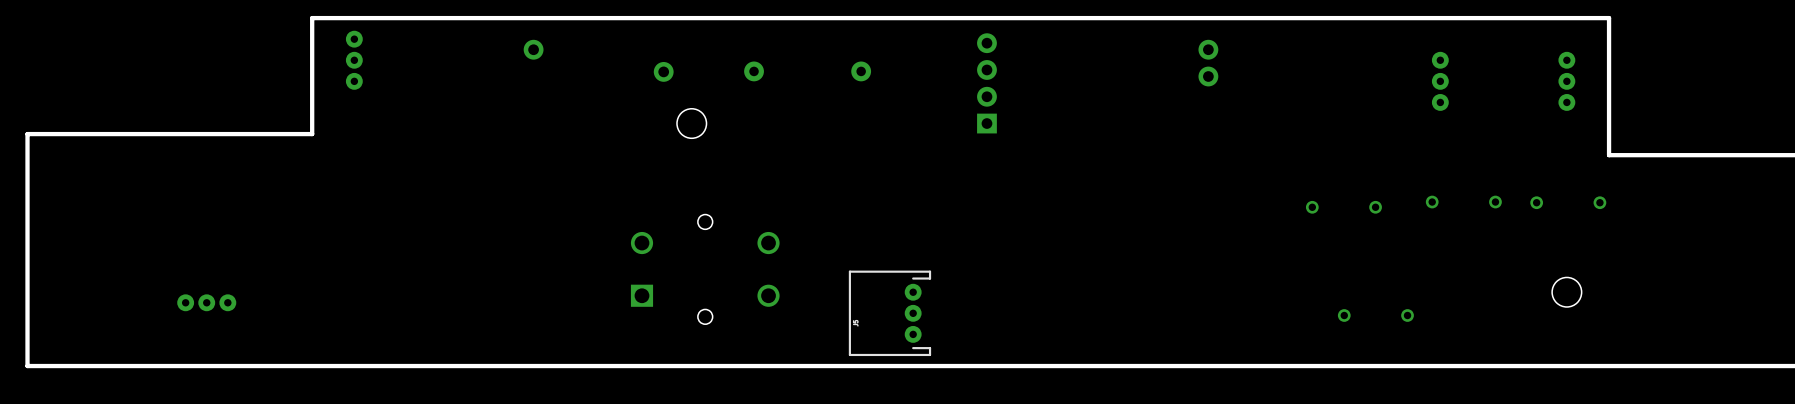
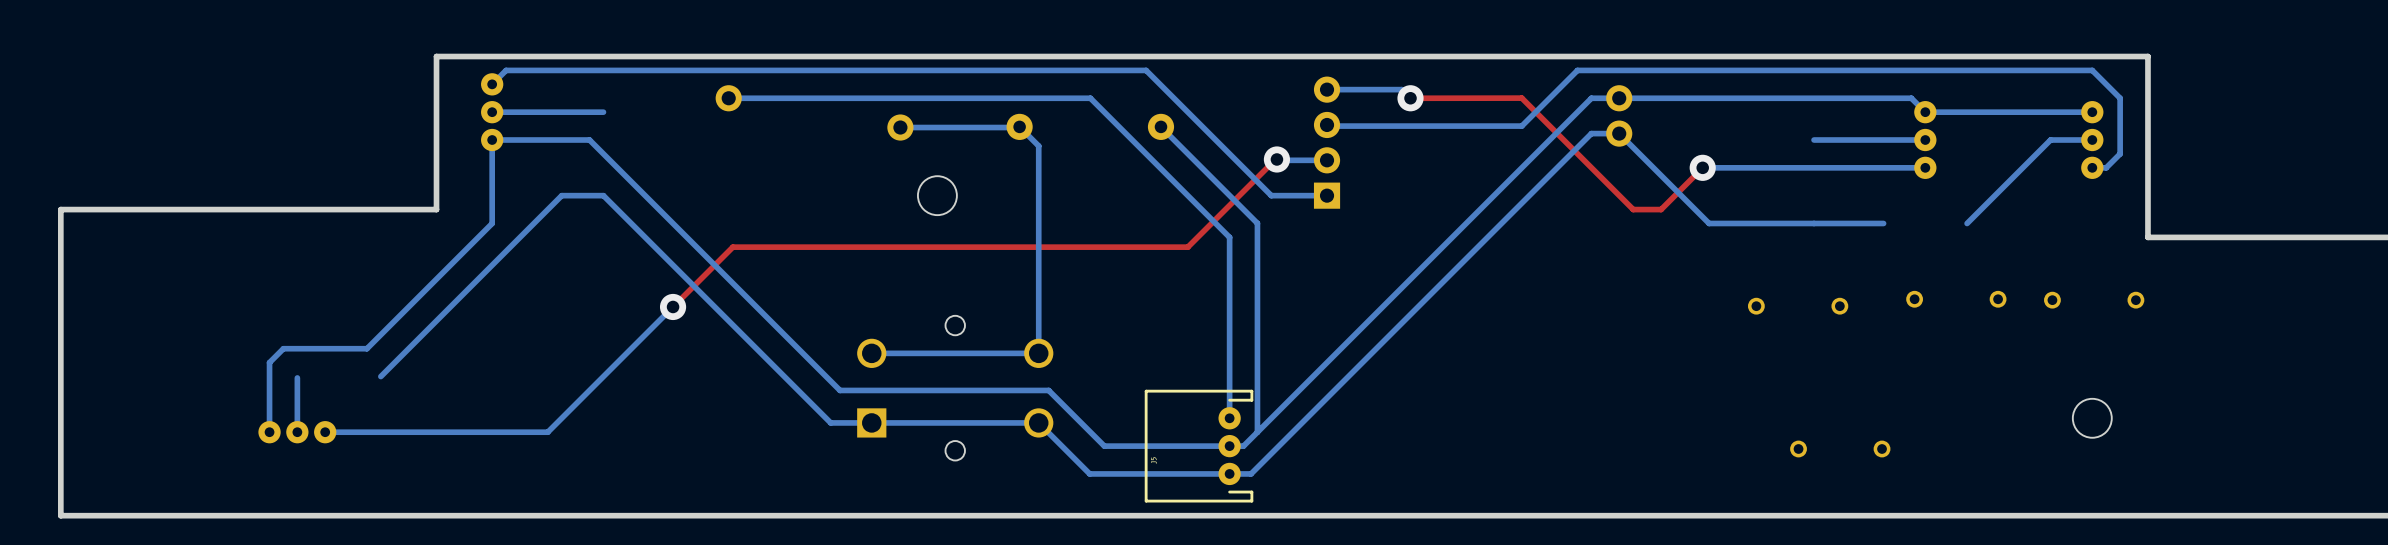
bottom track: none -> (492, 84) (506, 70) (1146, 70) (1271, 195) (1327, 195)
bottom track: none -> (1327, 89) (1401, 89) (1410, 98)
bottom track: none -> (728, 98) (1090, 98) (1229, 237) (1229, 418)
top track: none -> (1410, 98) (1521, 98) (1633, 209) (1661, 209) (1702, 167)
via: none -> (1410, 98)
bottom track: none -> (603, 112) (492, 112)
bottom track: none -> (2092, 112) (1925, 112) (1911, 98) (1591, 98) (1243, 446) (1104, 446) (1048, 390) (840, 390) (589, 140) (492, 140) (492, 223) (366, 348) (283, 348) (269, 362) (269, 432)
bottom track: none -> (1327, 124) (1521, 126) (1577, 70) (2092, 70) (2120, 98) (2120, 153) (2106, 167) (2092, 167)
bottom track: none -> (900, 127) (1019, 126) (1038, 146) (1038, 353) (871, 353)
bottom track: none -> (1160, 126) (1257, 223) (1257, 432)
bottom track: none -> (1925, 140) (1814, 140)
bottom track: none -> (2092, 140) (2050, 140) (1967, 223)
bottom track: none -> (1276, 159) (1327, 160)
top track: none -> (1276, 159) (1187, 247) (732, 247) (673, 306)
via: none -> (1276, 159)
via: none -> (1702, 167)
bottom track: none -> (1925, 167) (1702, 167)
bottom track: none -> (1883, 223) (1709, 223) (1619, 133) (1591, 133) (1251, 473) (1089, 473) (1038, 422) (830, 422) (603, 195) (561, 195) (380, 376)
bottom track: none -> (673, 306) (547, 432) (325, 432)
via: none -> (673, 306)
bottom track: none -> (297, 377) (297, 432)

